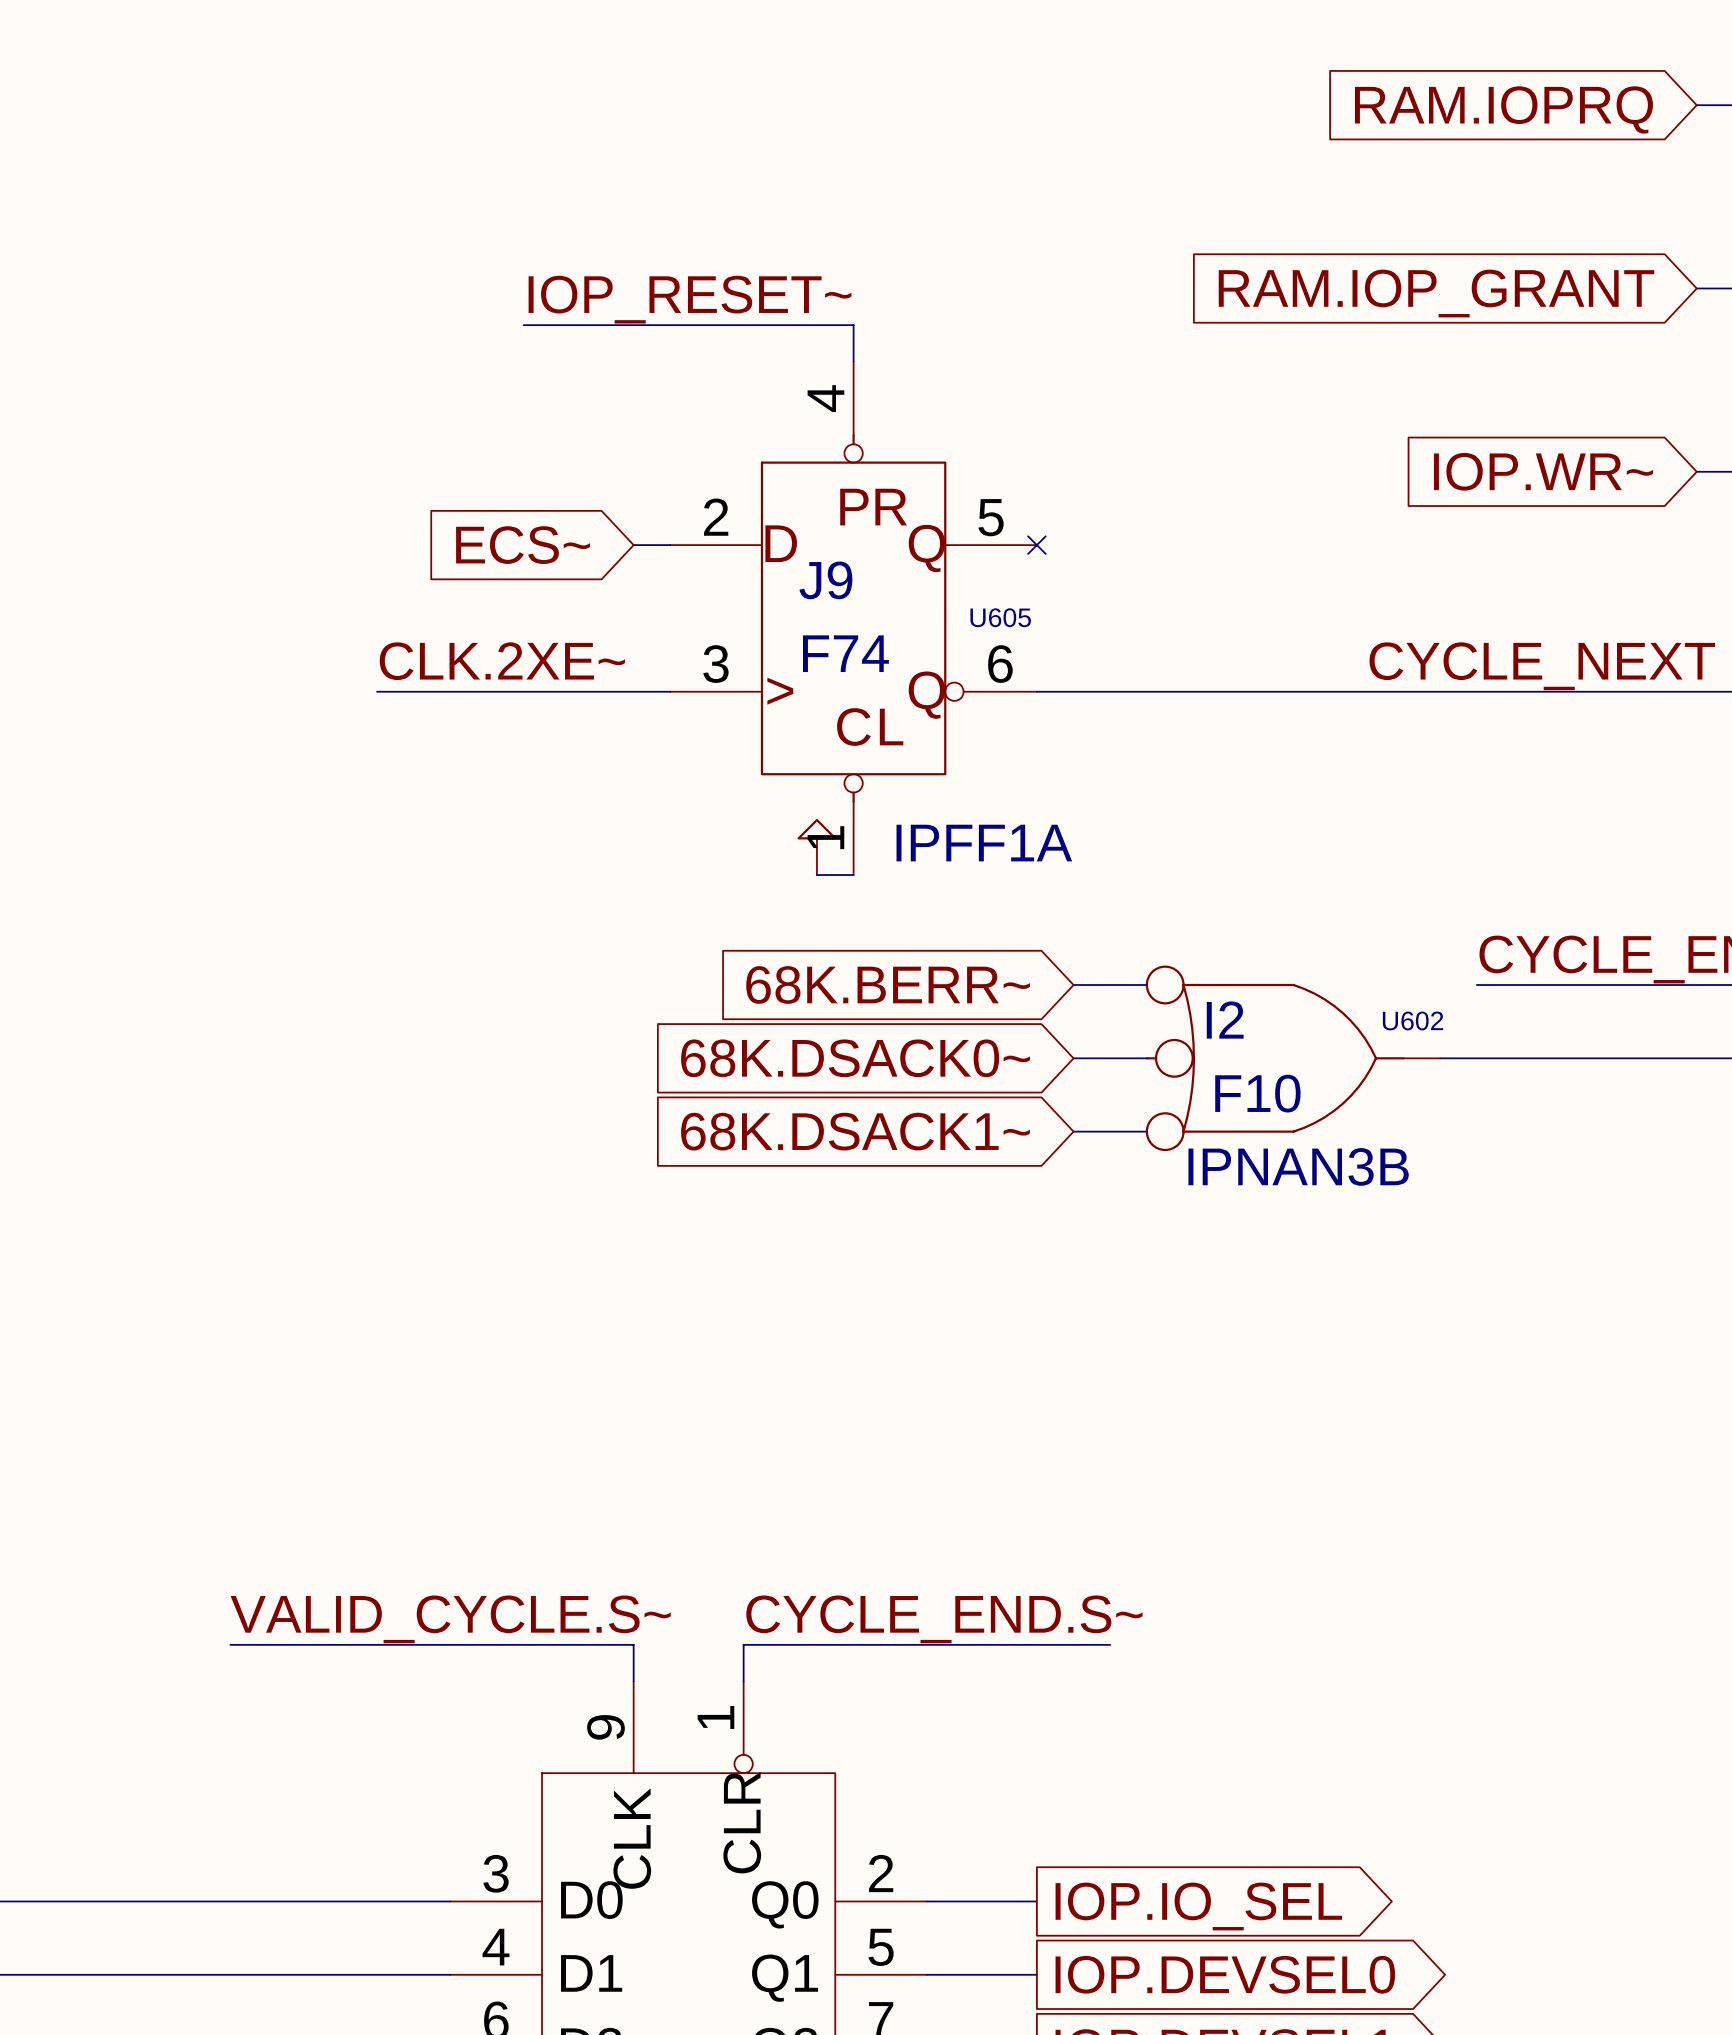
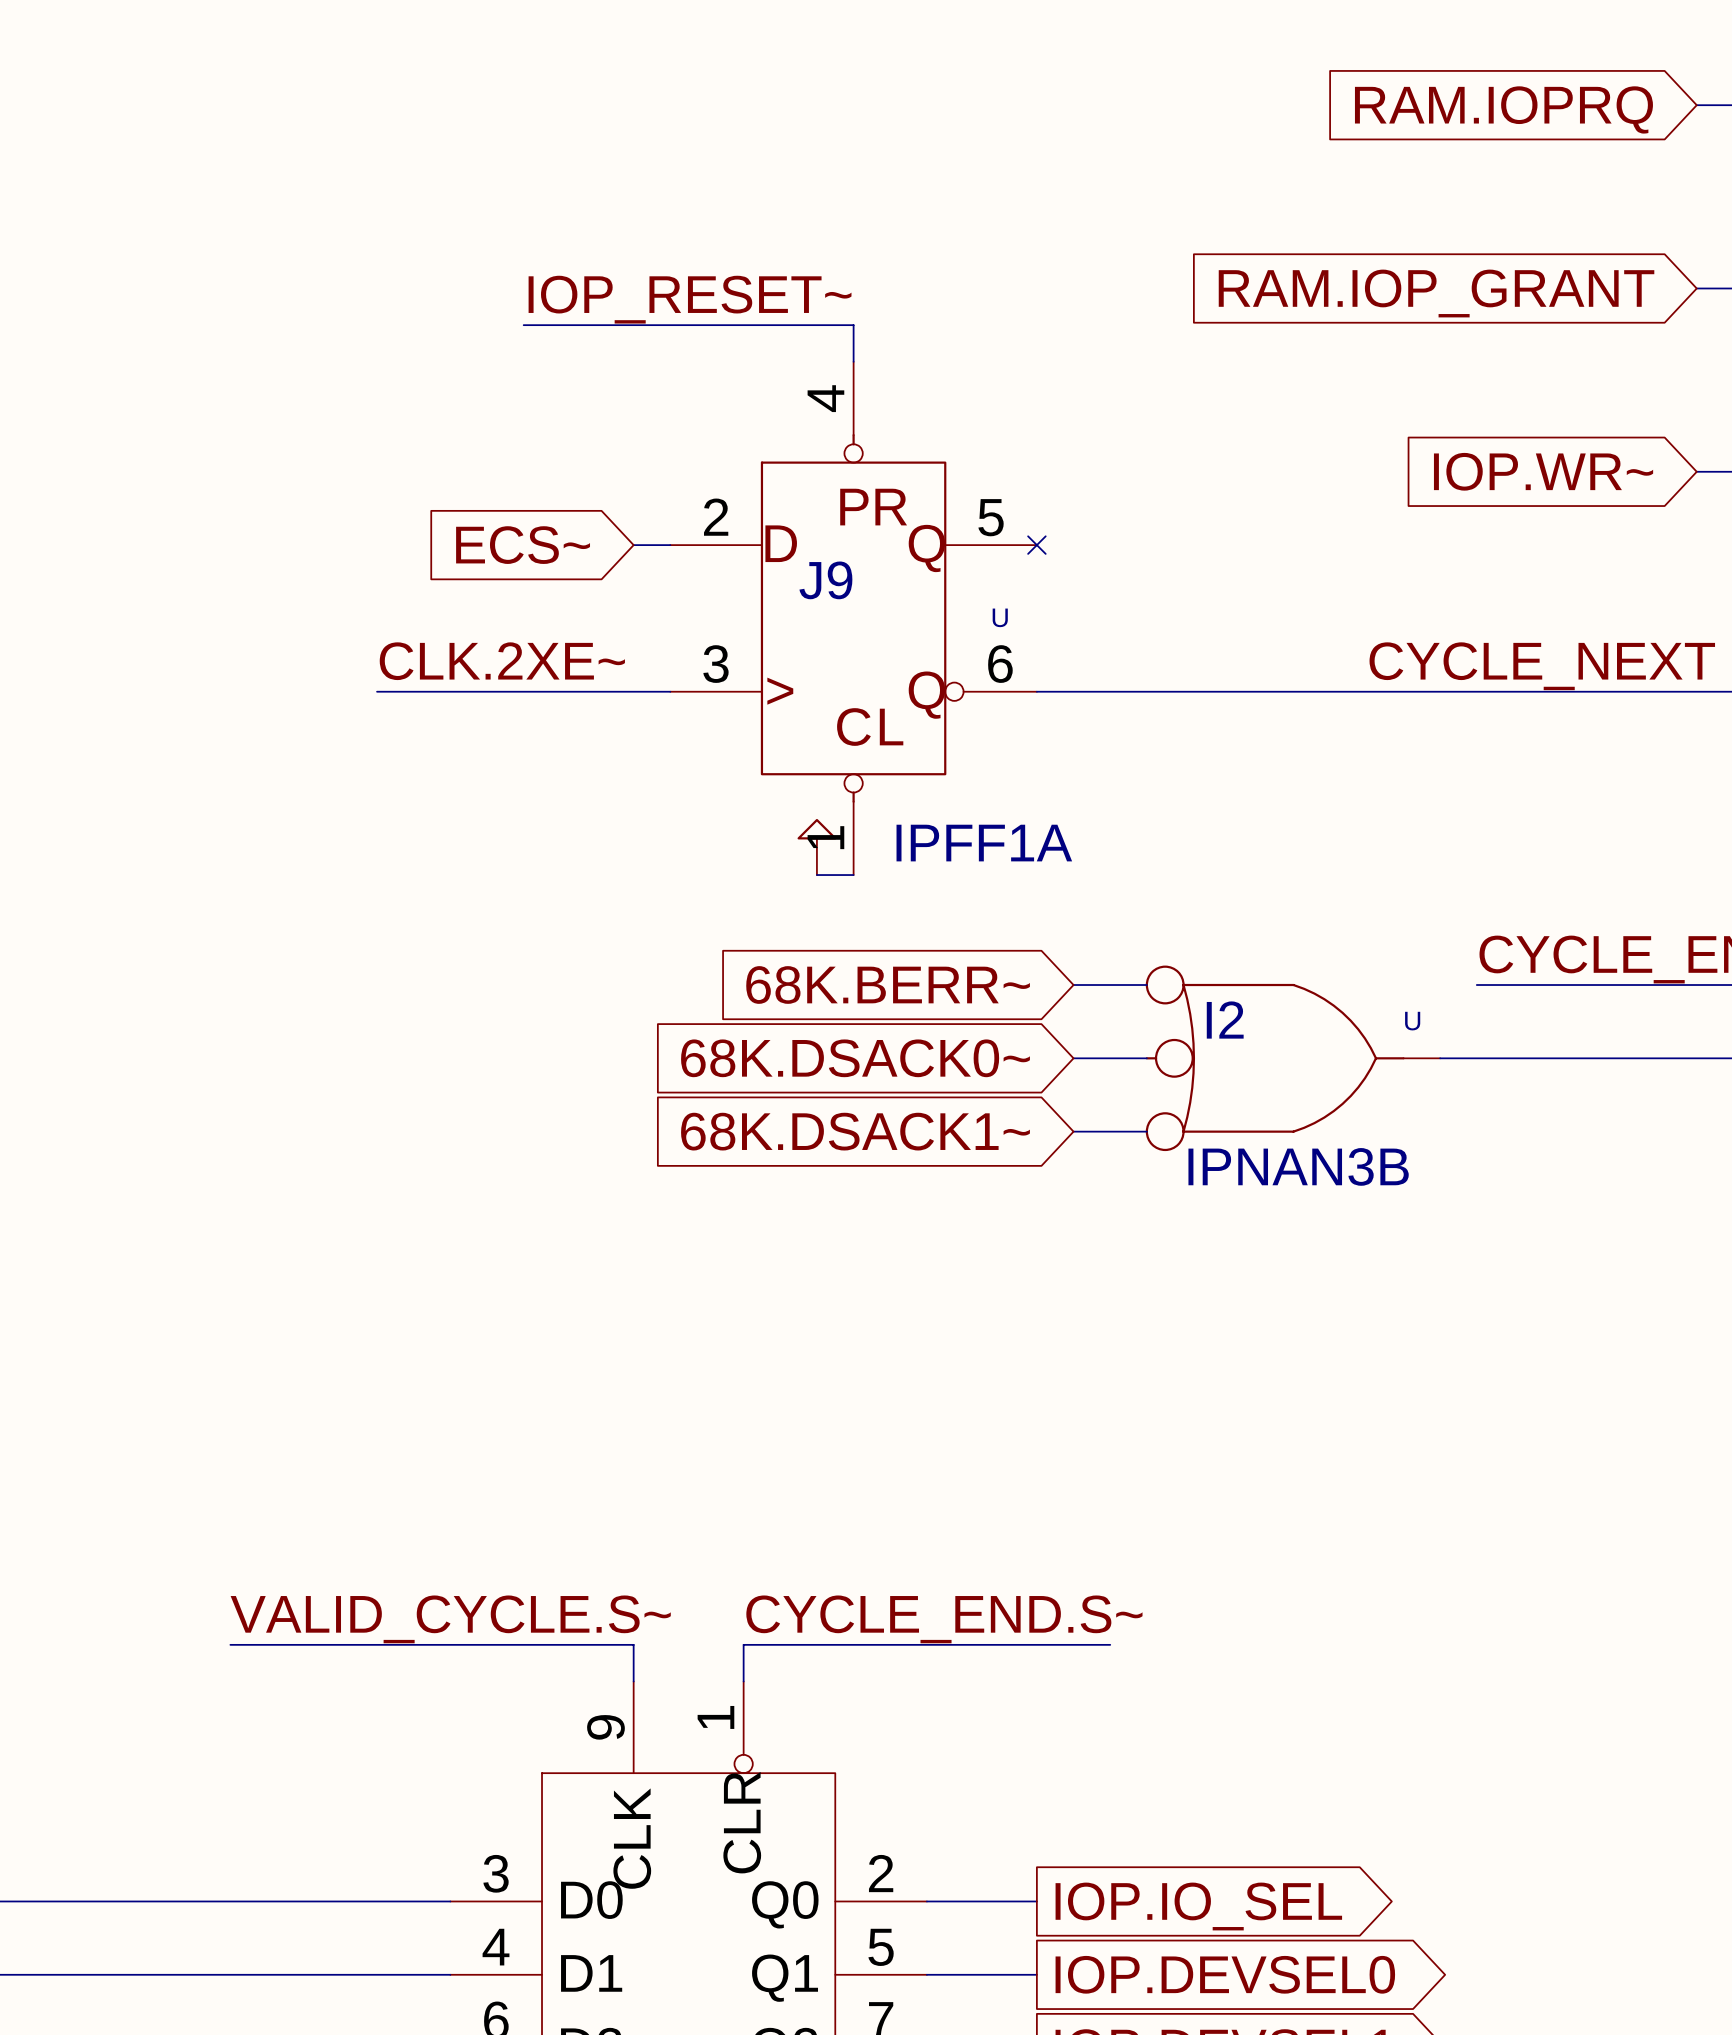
U605 name: U605 (1000, 617) -> U (1000, 617)
U605 value: F74 (845, 653) -> none
U602 name: U602 (1413, 1020) -> U (1412, 1021)
U602 value: F10 (1257, 1093) -> none

